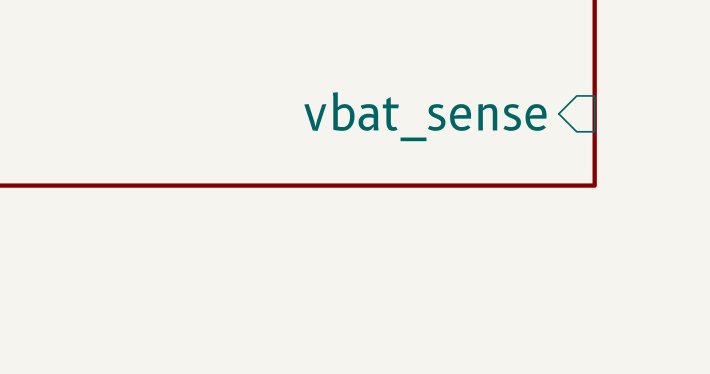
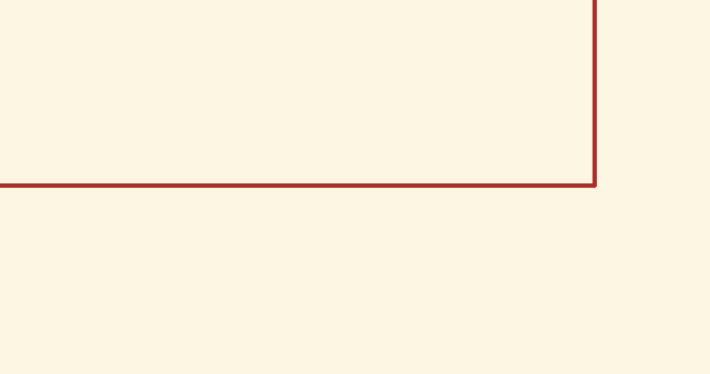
sheet pin: vbat_sense (425, 116) -> none

